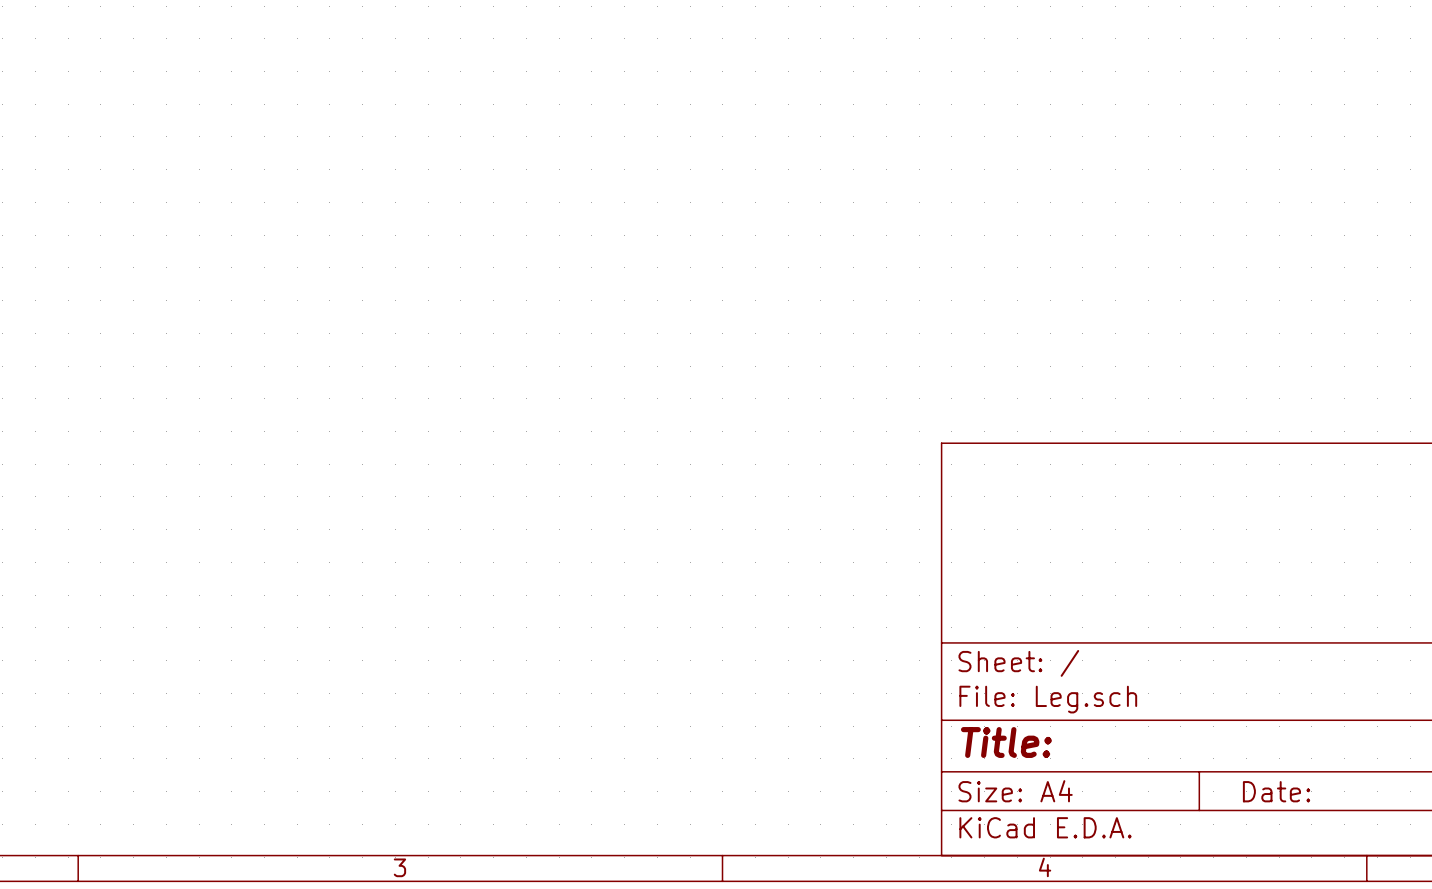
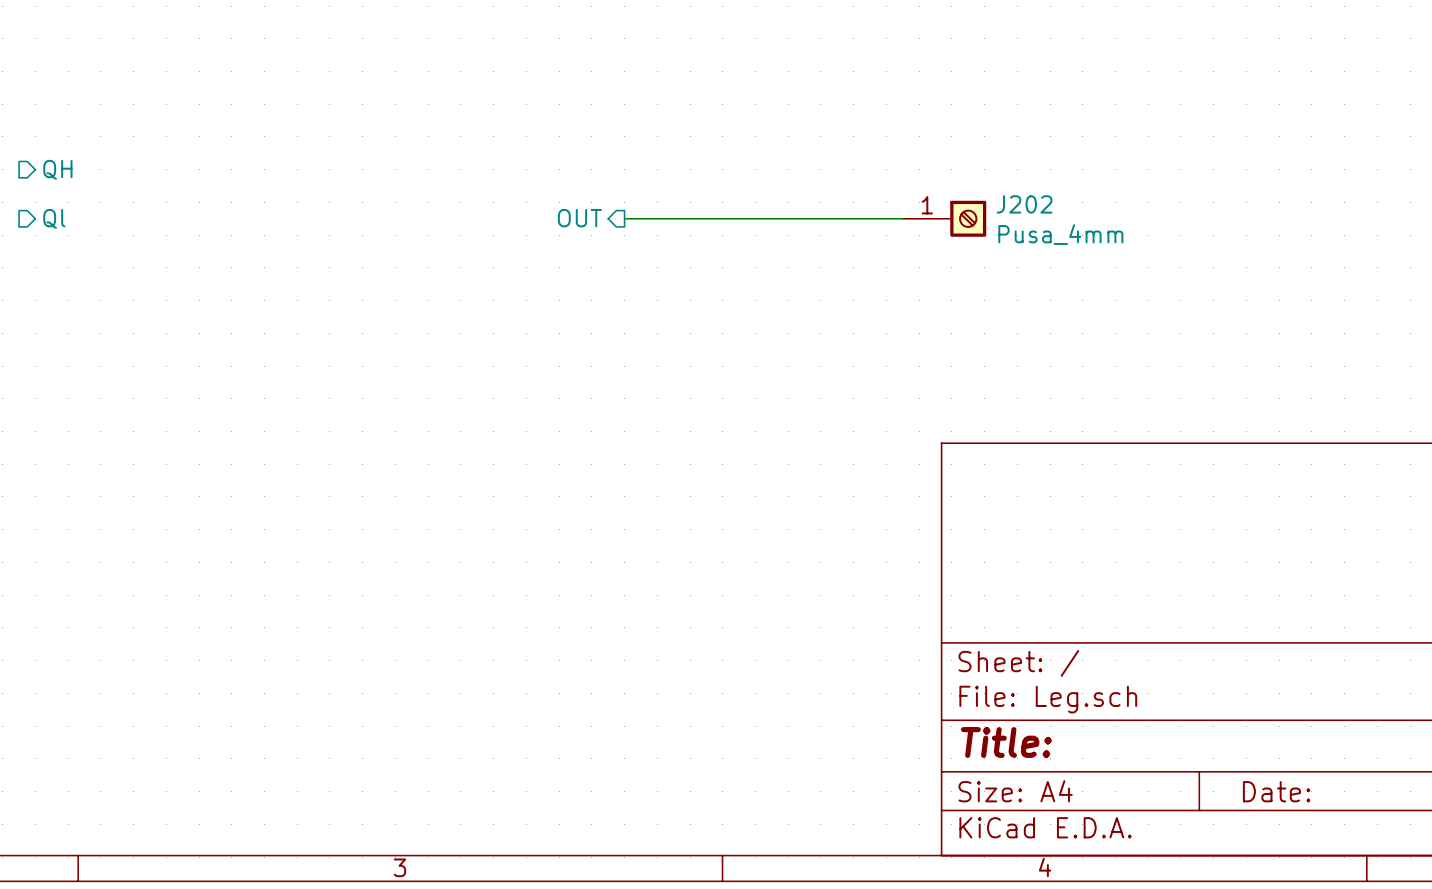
sheet pin: none -> QH (57, 169)
sheet pin: none -> Ql (54, 218)
sheet pin: none -> OUT (579, 218)
wire: none -> (624, 218) (902, 218)
J202: none -> Pusa_4mm (944, 218)

